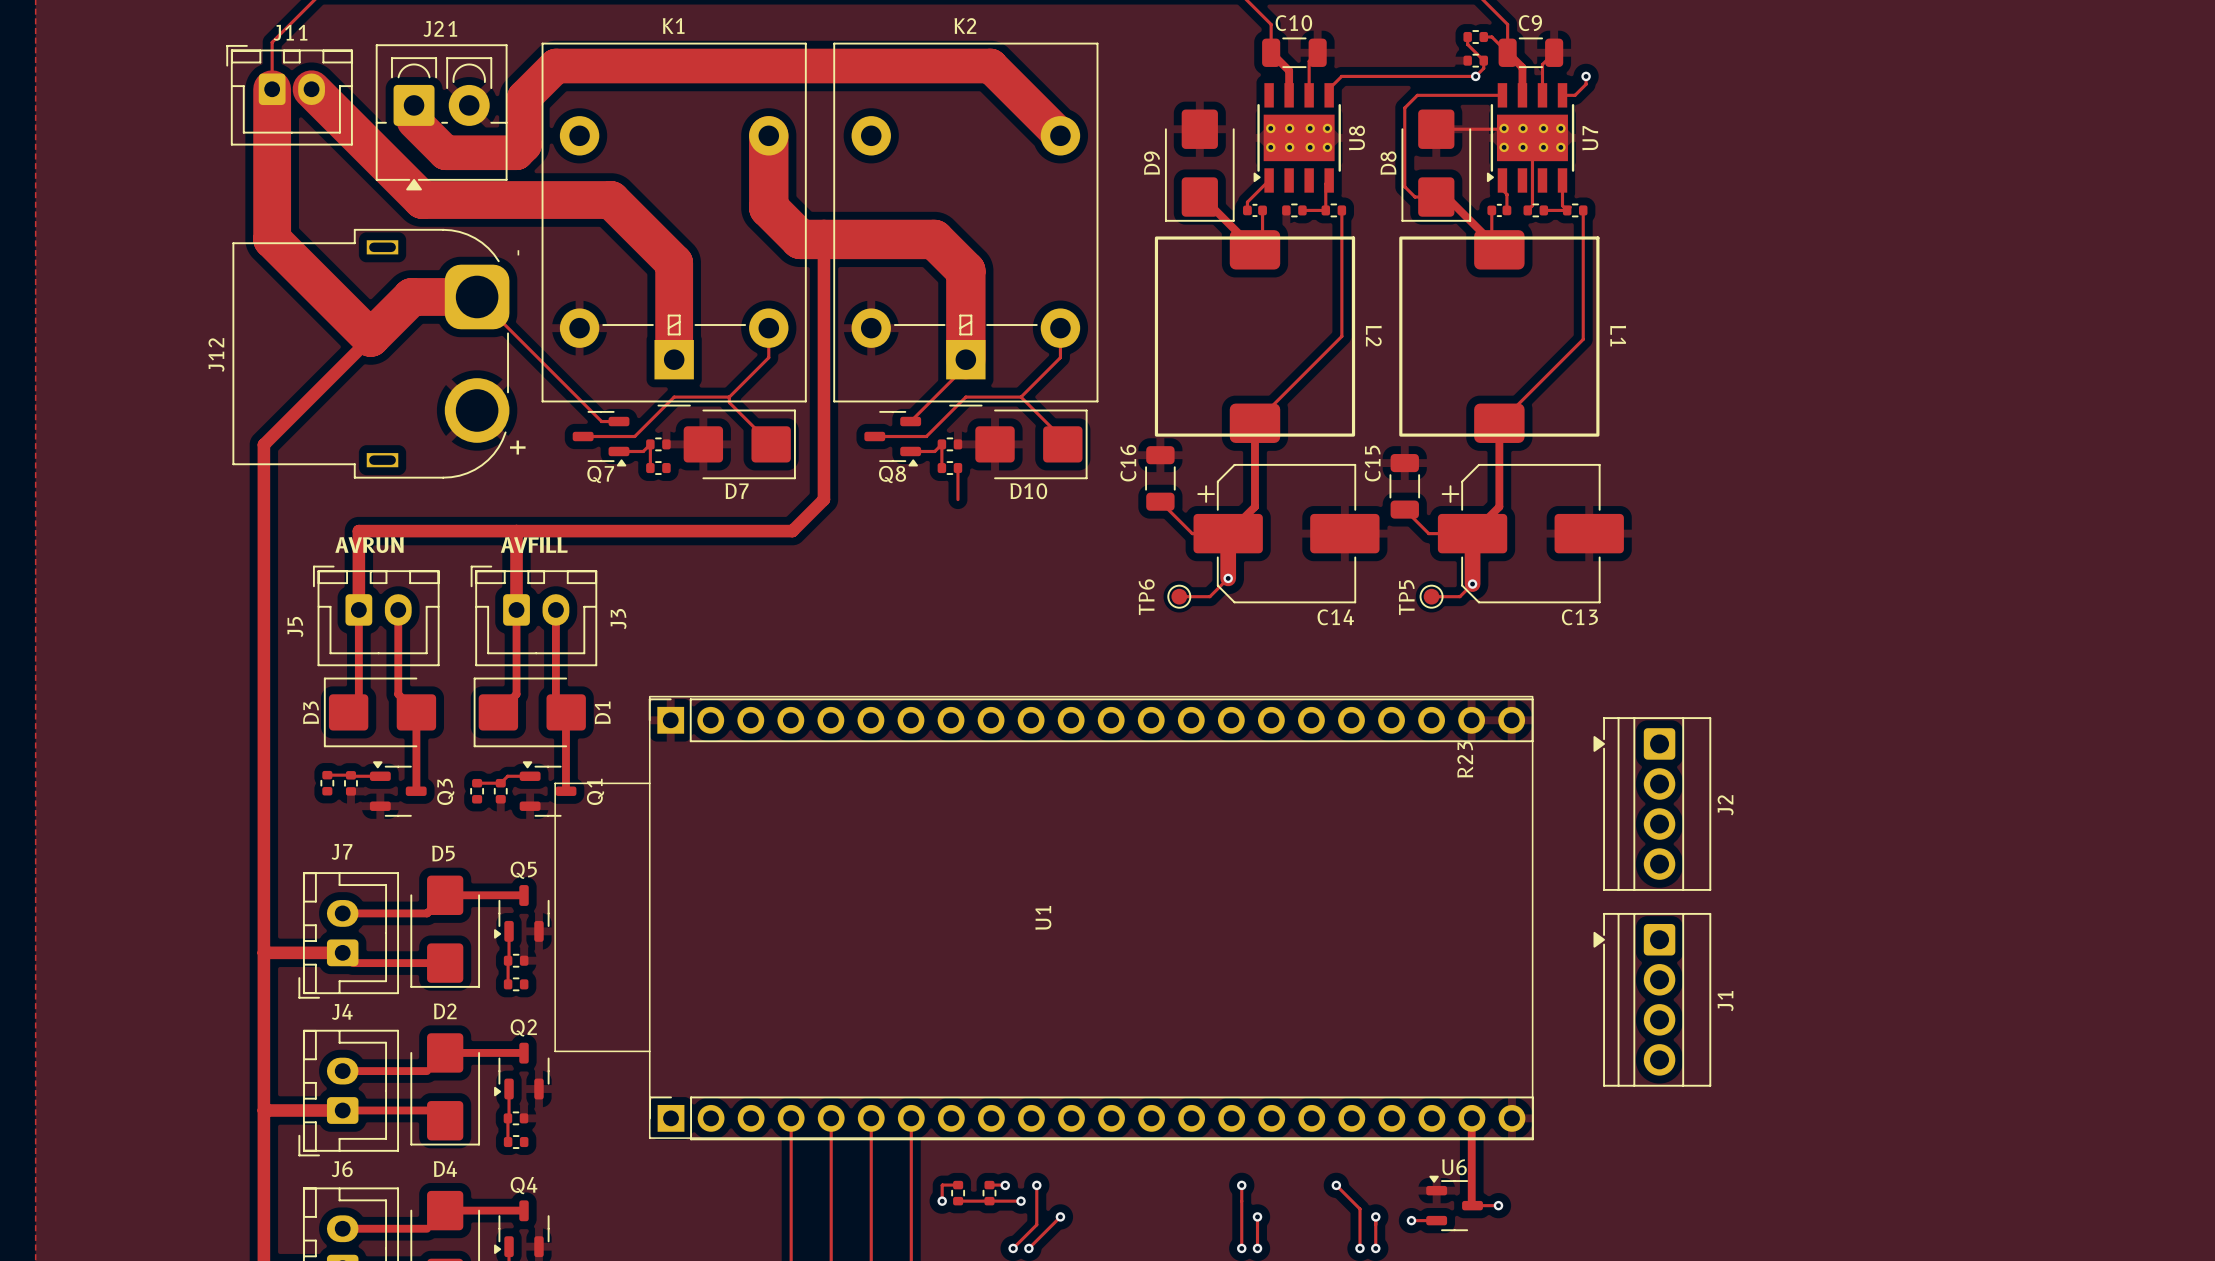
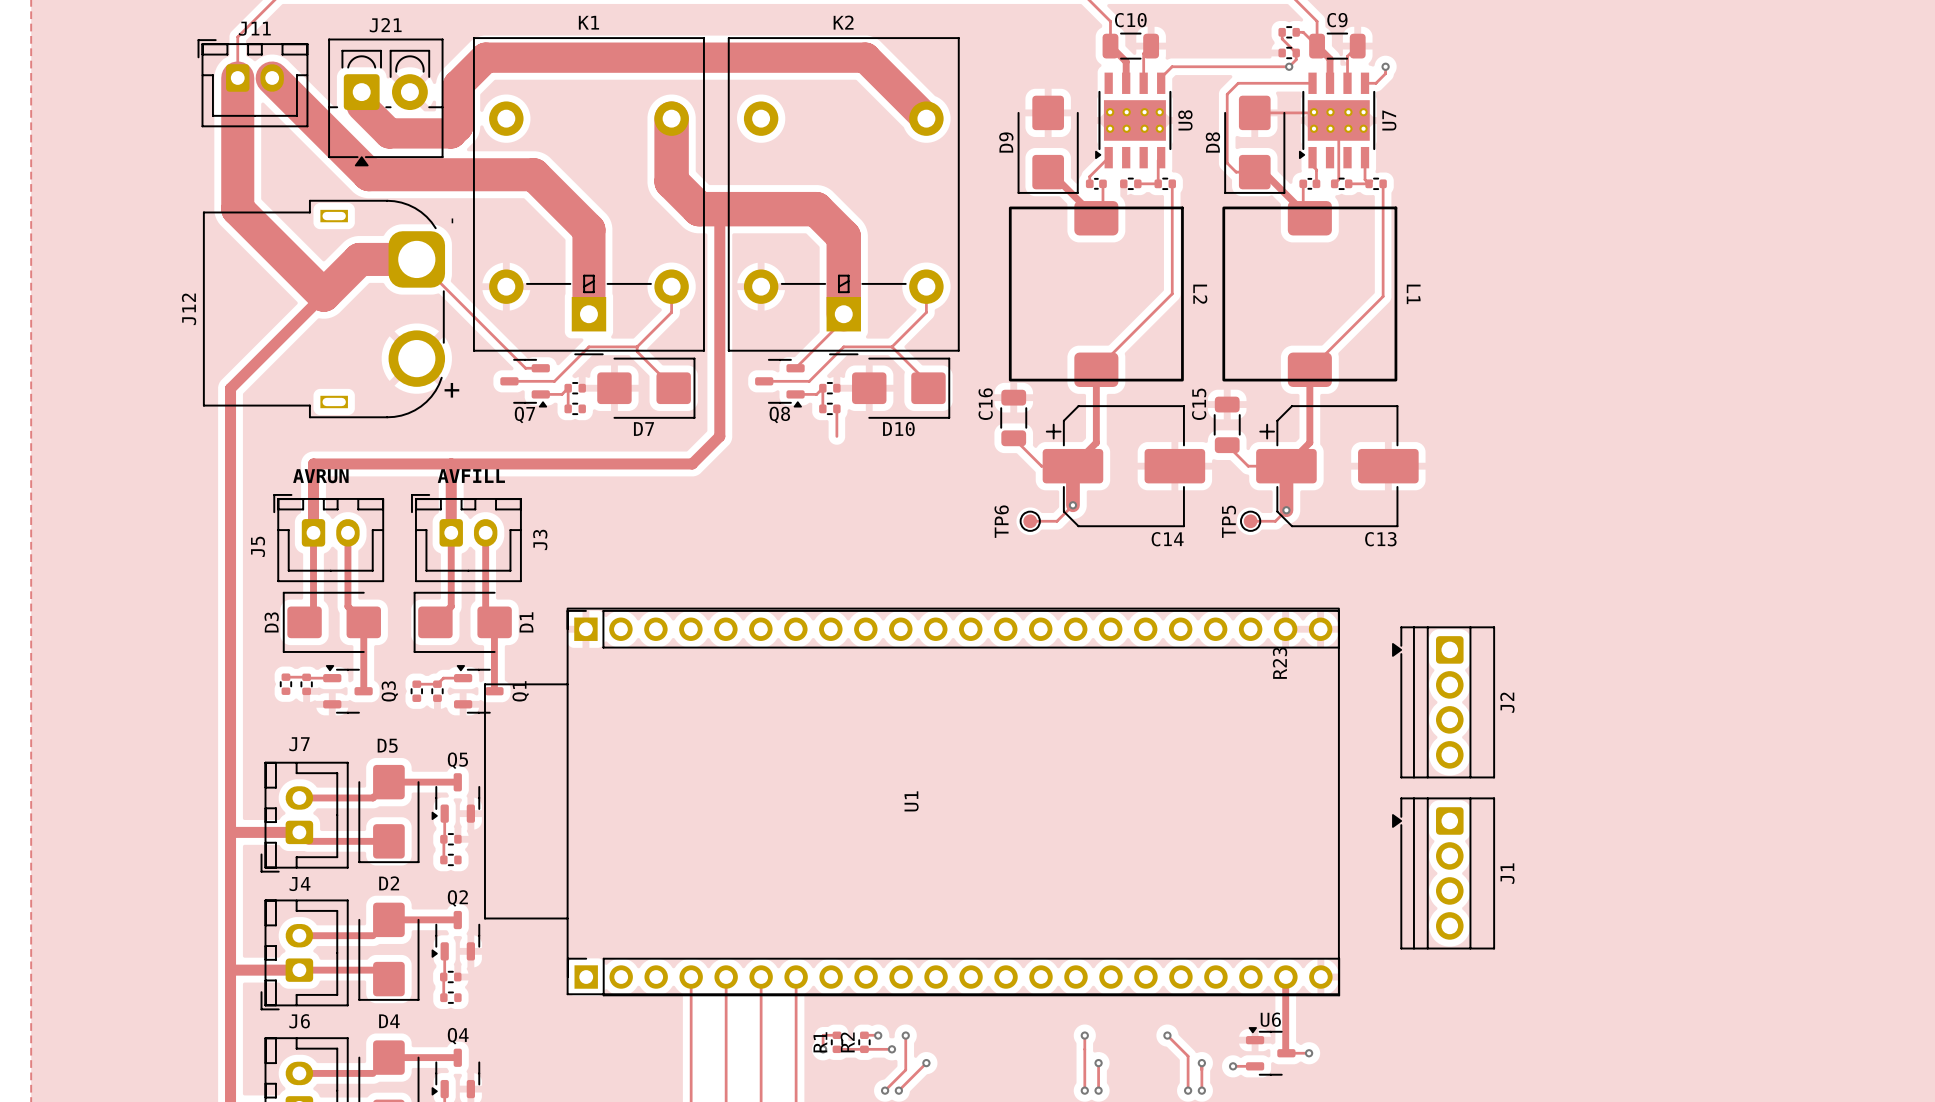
R1 name: none -> R1 (820, 1042)
R2 name: none -> R2 (847, 1042)

